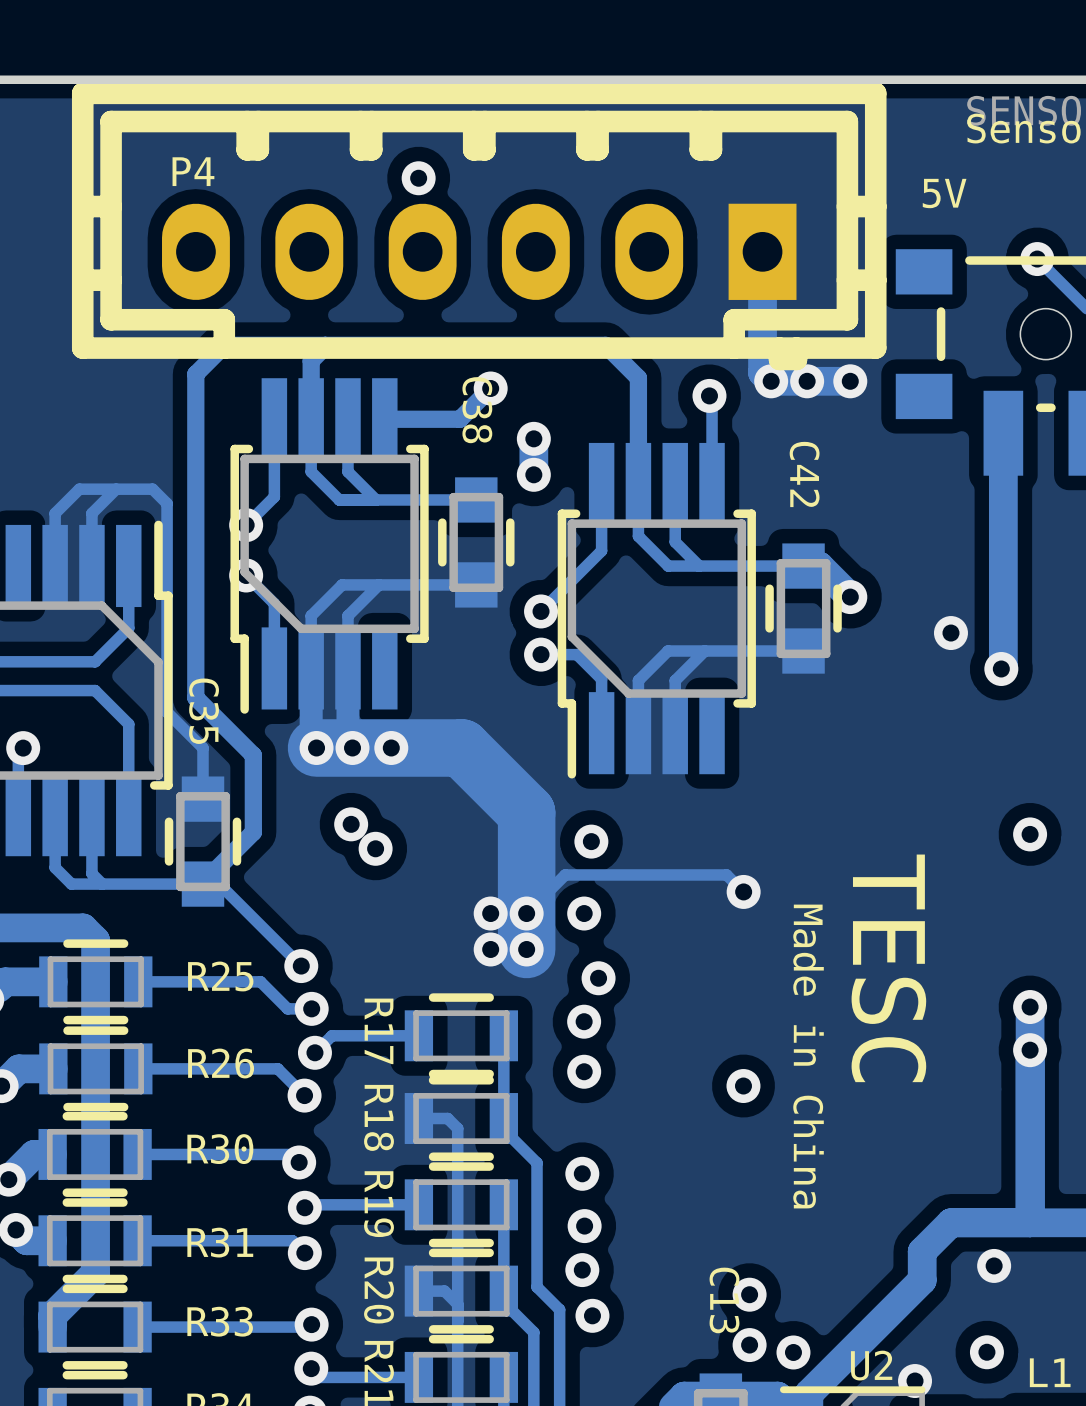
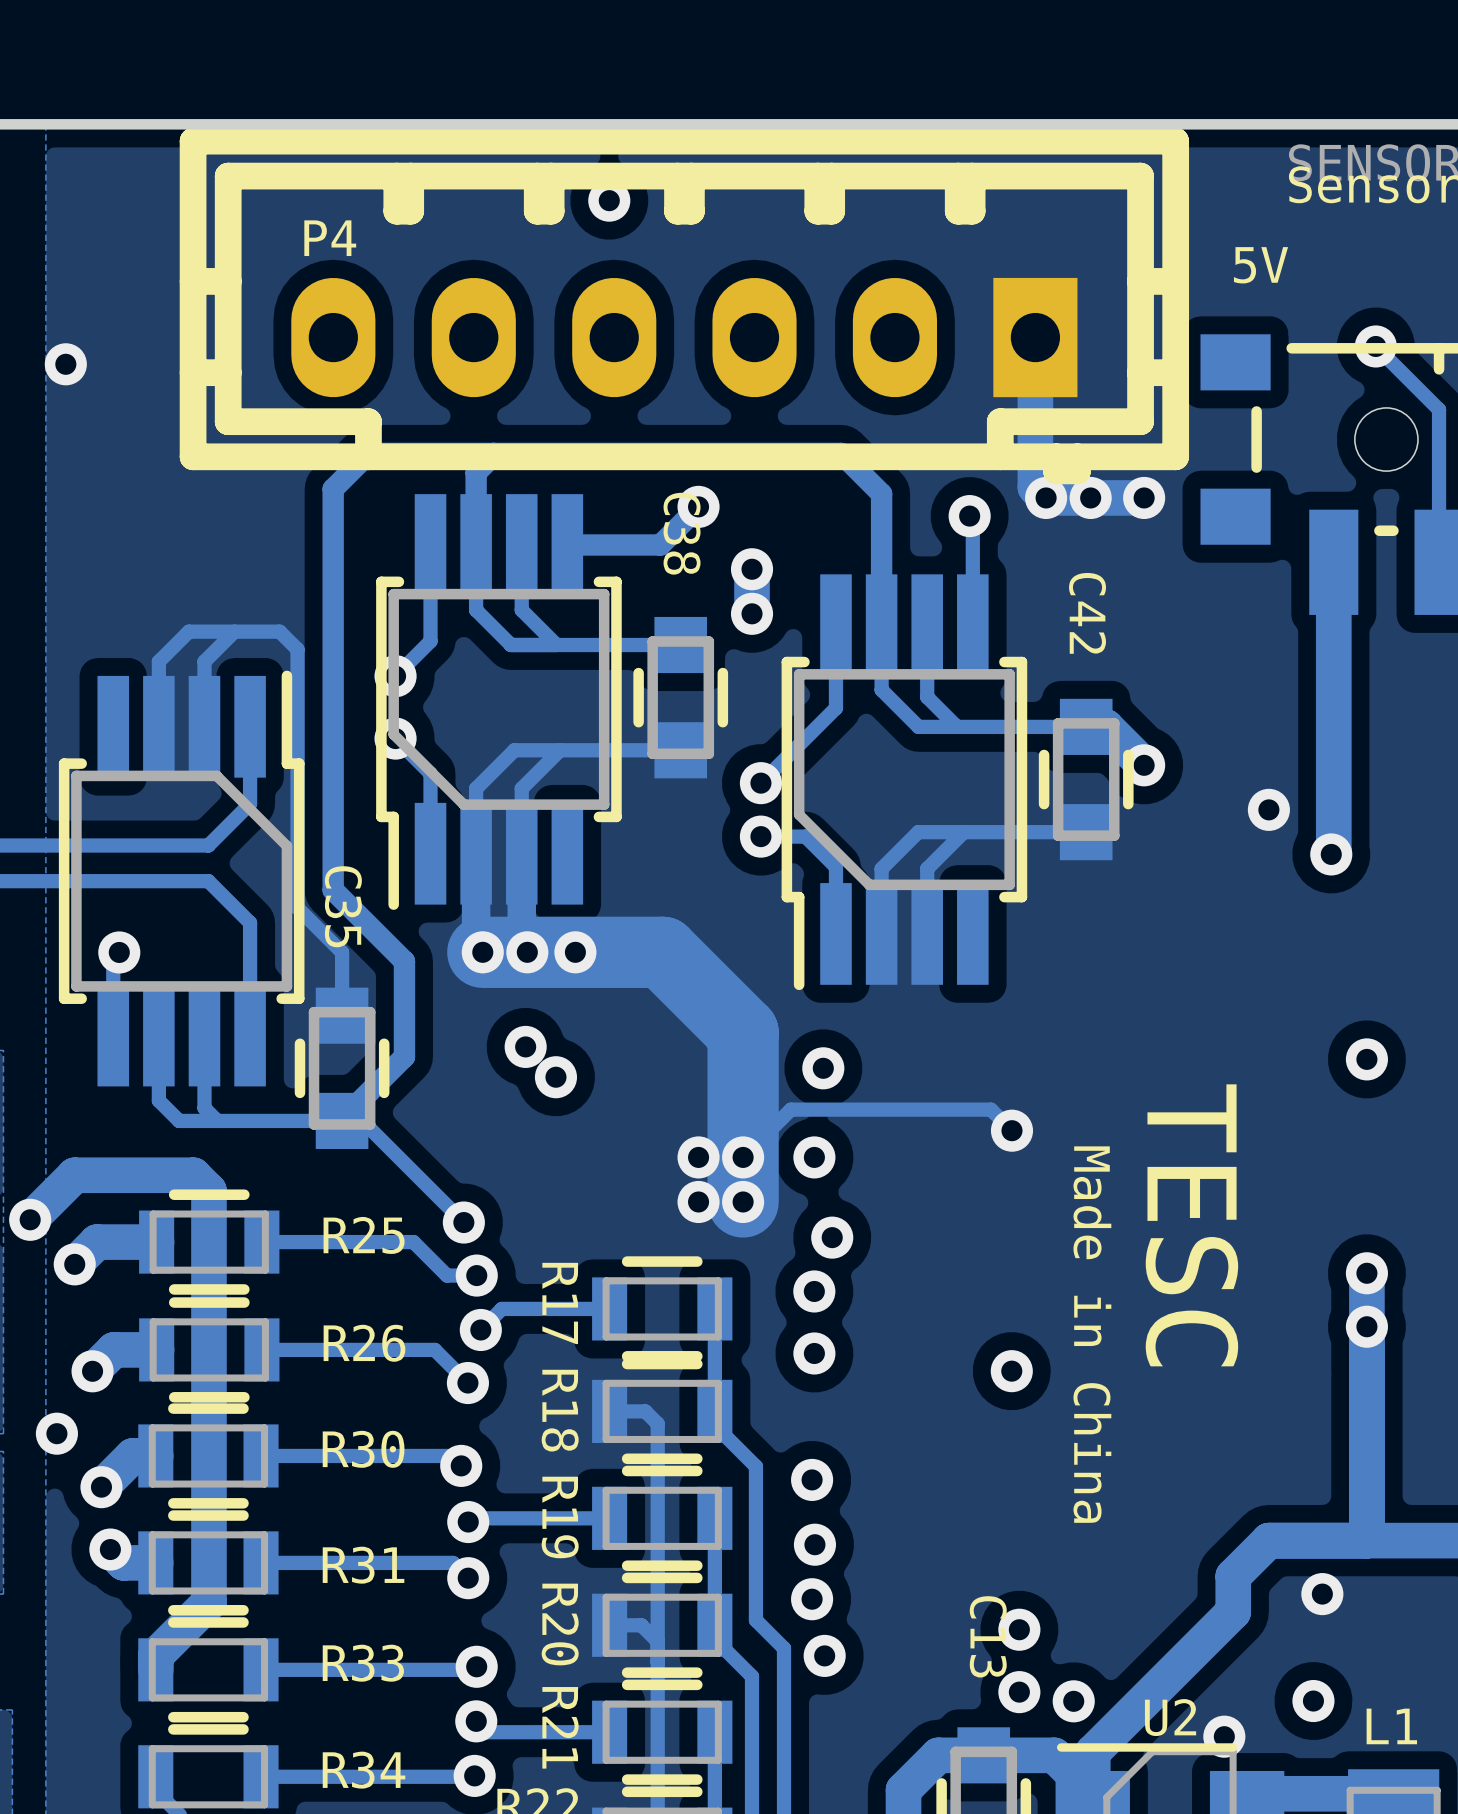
via position: (418, 178) -> (609, 200)

